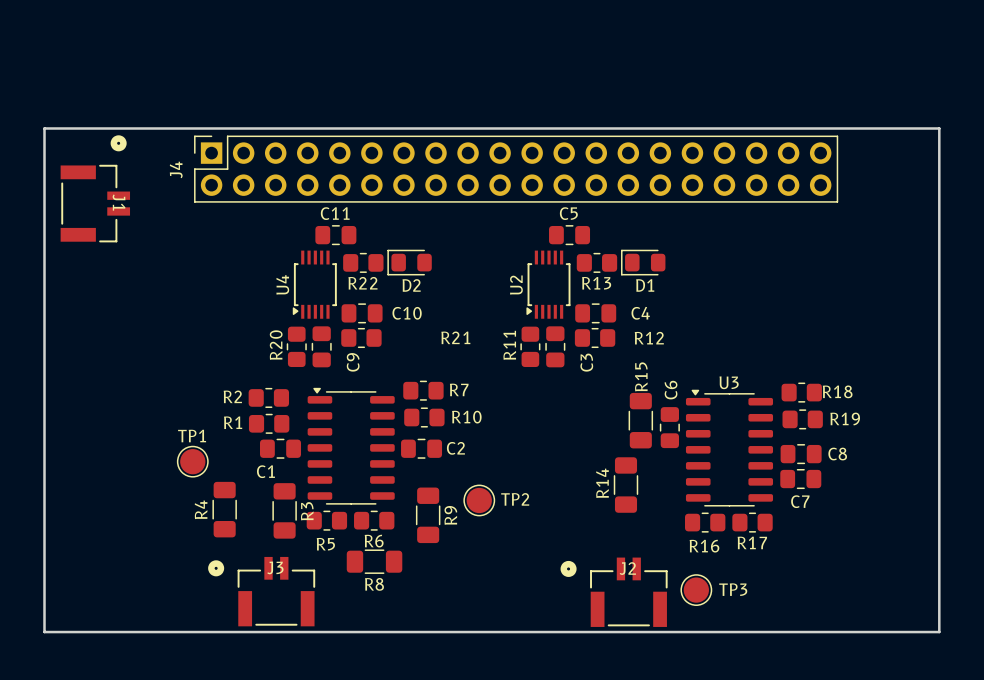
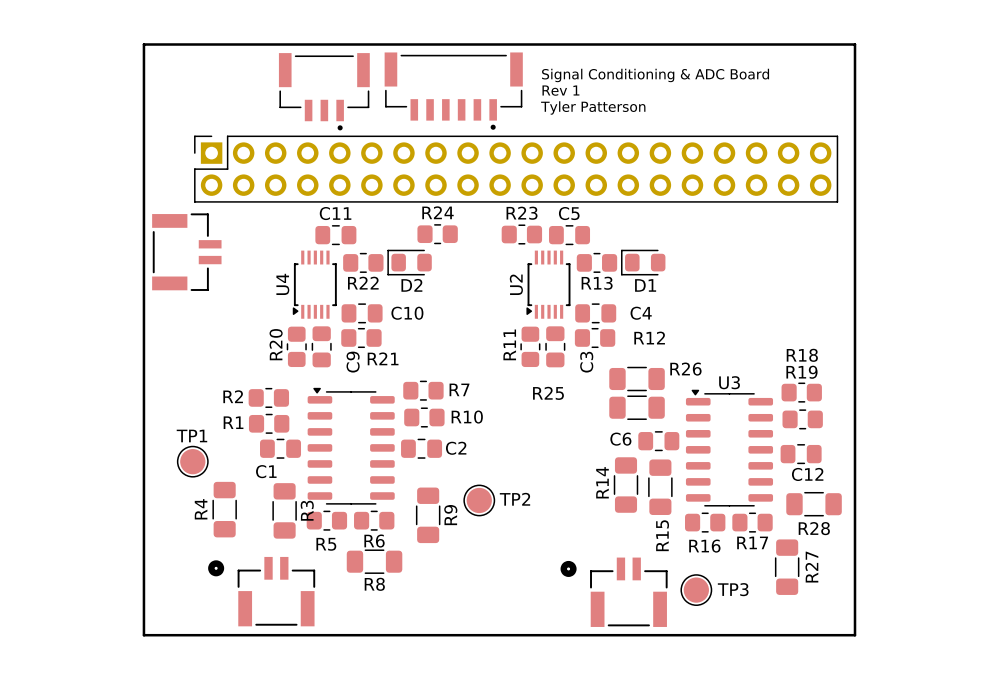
text: none -> Signal Conditioning & ADC Board (655, 75)
text: none -> Rev 1 (560, 90)
part: none -> (324, 91)
part: none -> (453, 91)
text: none -> Tyler Patterson (593, 107)
board edge: (44, 128) (939, 128) (939, 632) (44, 632) (44, 128) -> (143, 44) (143, 635) (855, 635) (855, 44) (143, 44)
J4 name: J4 (176, 169) -> none
J1: (95, 188) -> none
R24: none -> (437, 234)
R23: none -> (521, 234)
part: none -> (186, 252)
R21 name position: R21 (455, 337) -> R21 (383, 358)
R15 name position: R15 (641, 376) -> R15 (662, 535)
R26: none -> (637, 379)
C6 name position: C6 (671, 390) -> C6 (620, 439)
R18 name position: R18 (837, 391) -> R18 (802, 355)
R25: none -> (637, 407)
R19 name position: R19 (845, 418) -> R19 (801, 372)
R15 position: (640, 420) -> (660, 487)
C6 rotation: 0° (669, 427) -> 90° clockwise (658, 441)
C8 name: C8 (837, 454) -> C12 (807, 474)
C7: (800, 479) -> none
R28: none -> (814, 504)
J3 name: J3 (275, 567) -> none
R27: none -> (787, 567)
J2 name: J2 (627, 568) -> none

